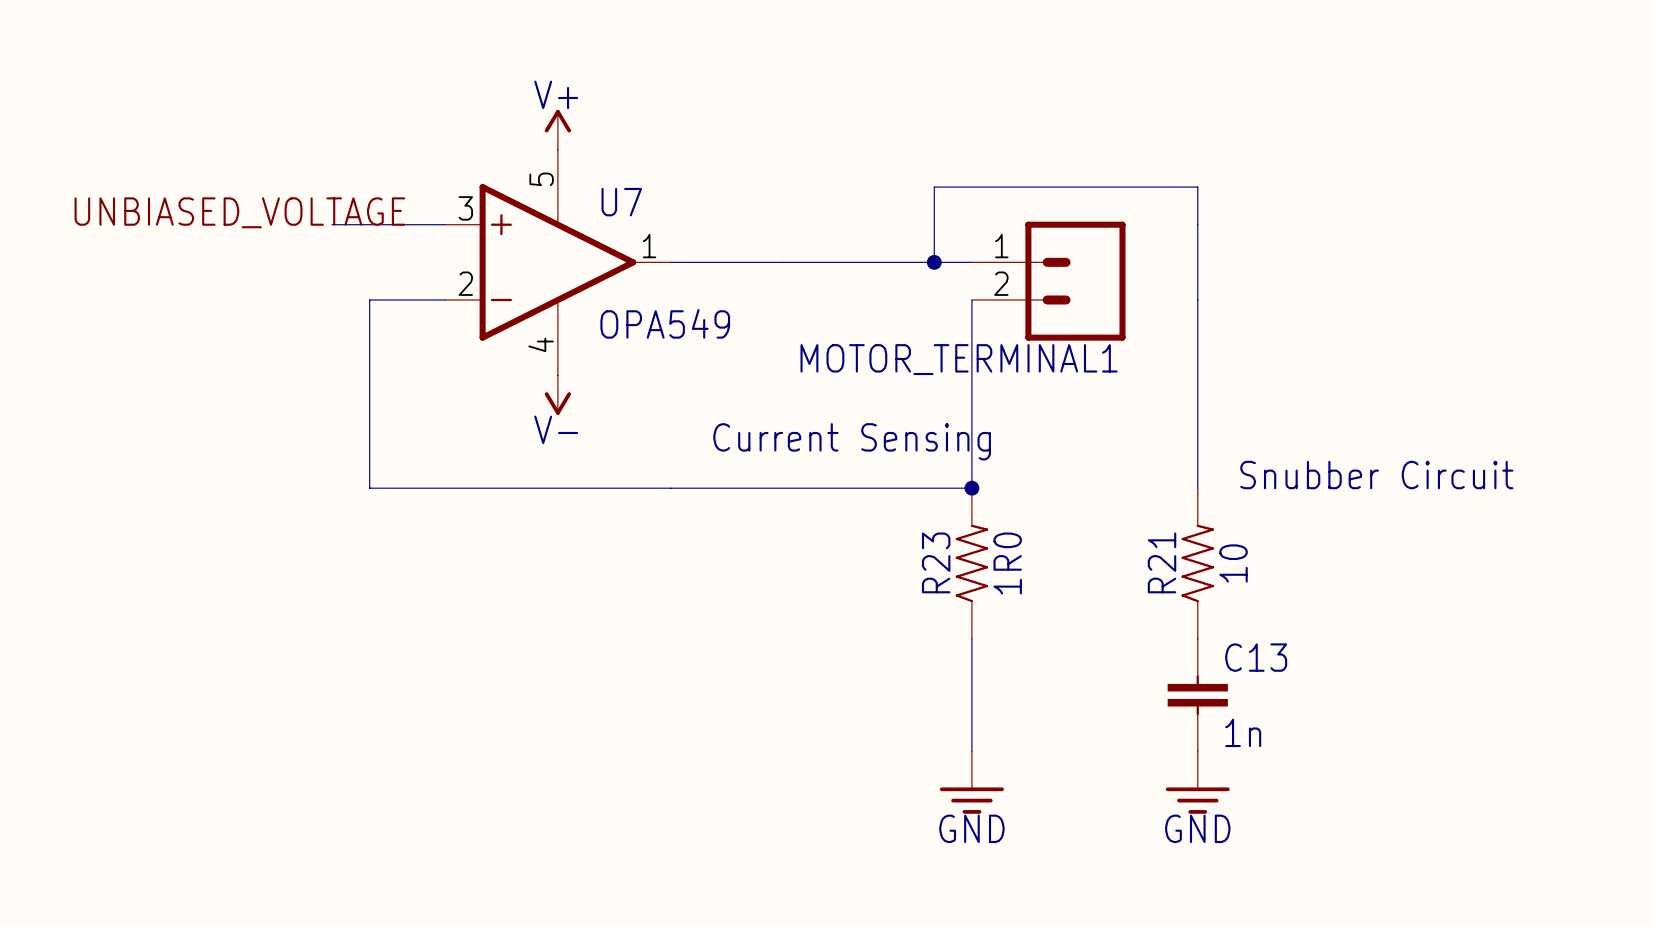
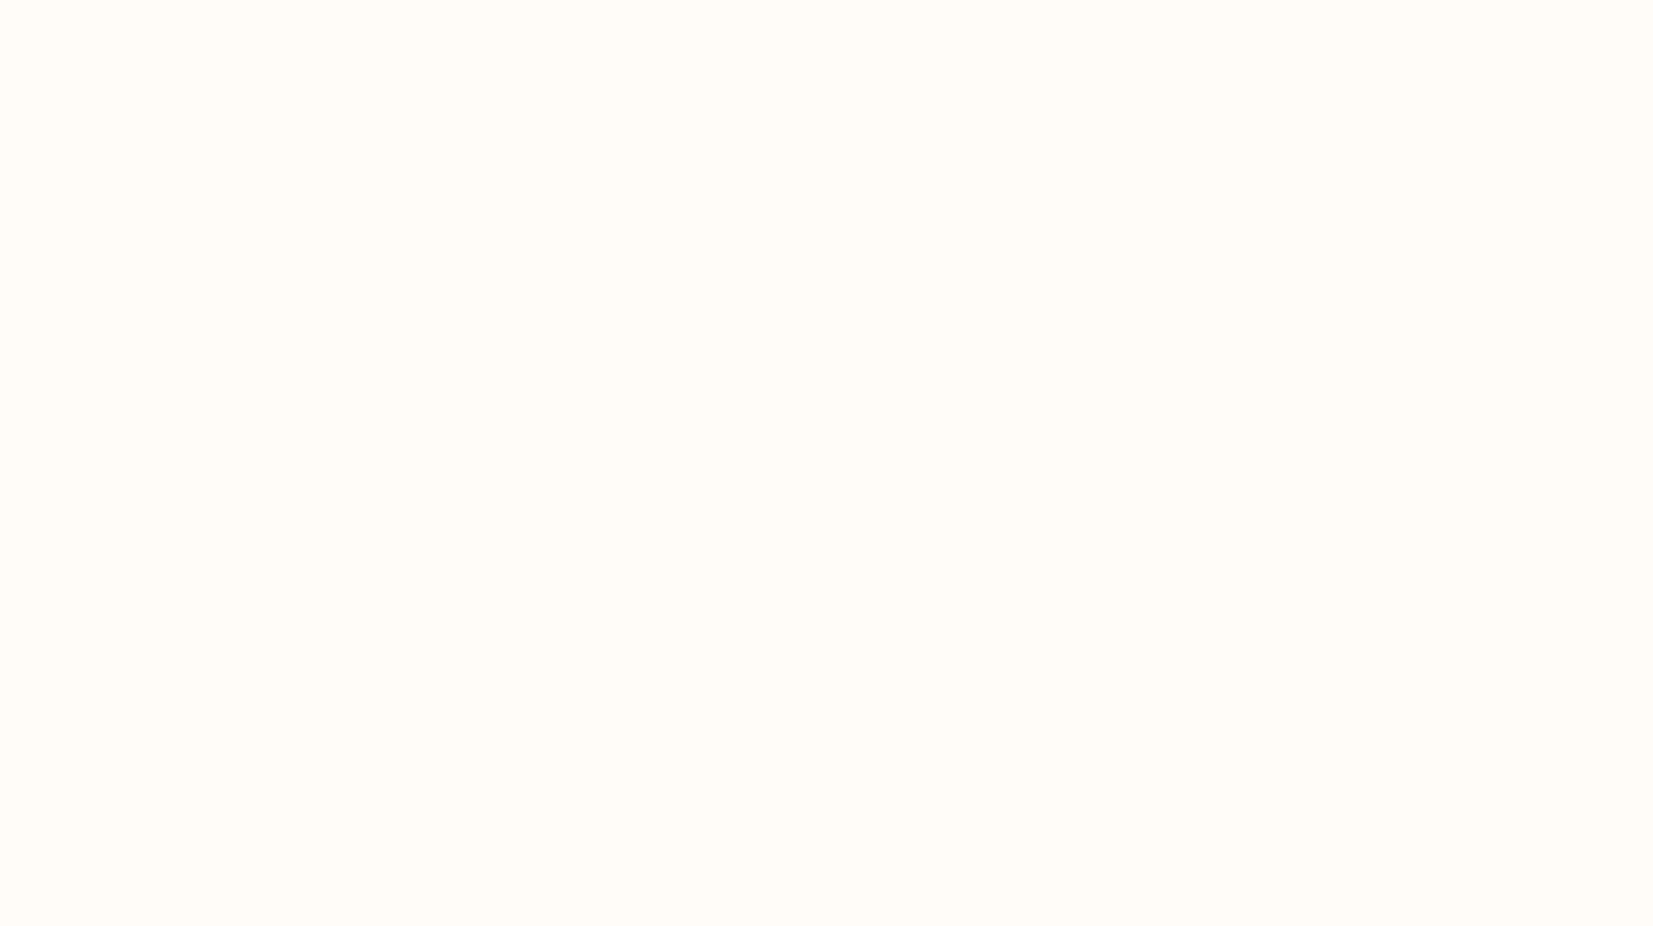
power symbol: V+ (557, 129) -> none
label: UNBIASED_VOLTAGE (239, 212) -> none
wire: (332, 224) (444, 224) -> none
U7: OPA549 (557, 262) -> none
wire: (670, 262) (971, 262) -> none
wire: (934, 262) (934, 187) (1197, 187) (1197, 488) -> none
junction: (934, 262) -> none
MOTOR_TERMINAL1: (1048, 281) -> none
wire: (444, 299) (369, 299) (369, 488) (971, 488) (971, 299) -> none
power symbol: V- (557, 395) -> none
text: Current Sensing (852, 441) -> none
text: Snubber Circuit (1376, 475) -> none
junction: (971, 488) -> none
R23: 1R0 (971, 563) -> none
R21: 10 (1197, 563) -> none
wire: (971, 638) (971, 751) -> none
C13: 1n (1197, 695) -> none
power symbol: GND (971, 782) -> none
power symbol: GND (1197, 782) -> none

